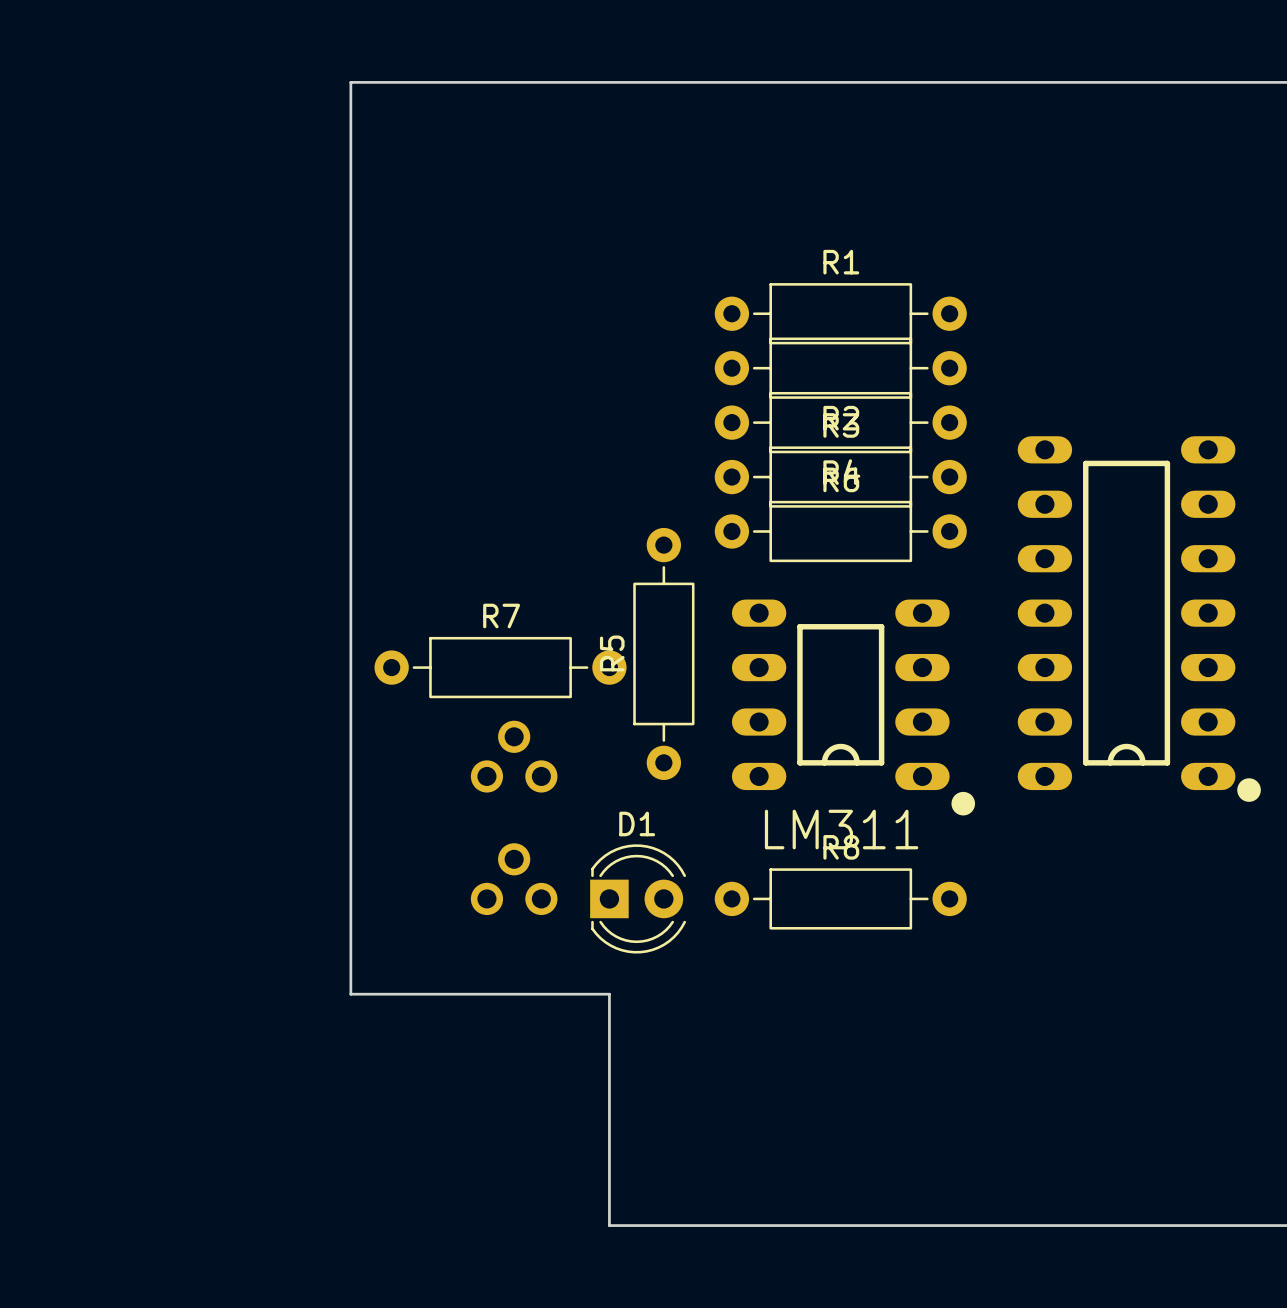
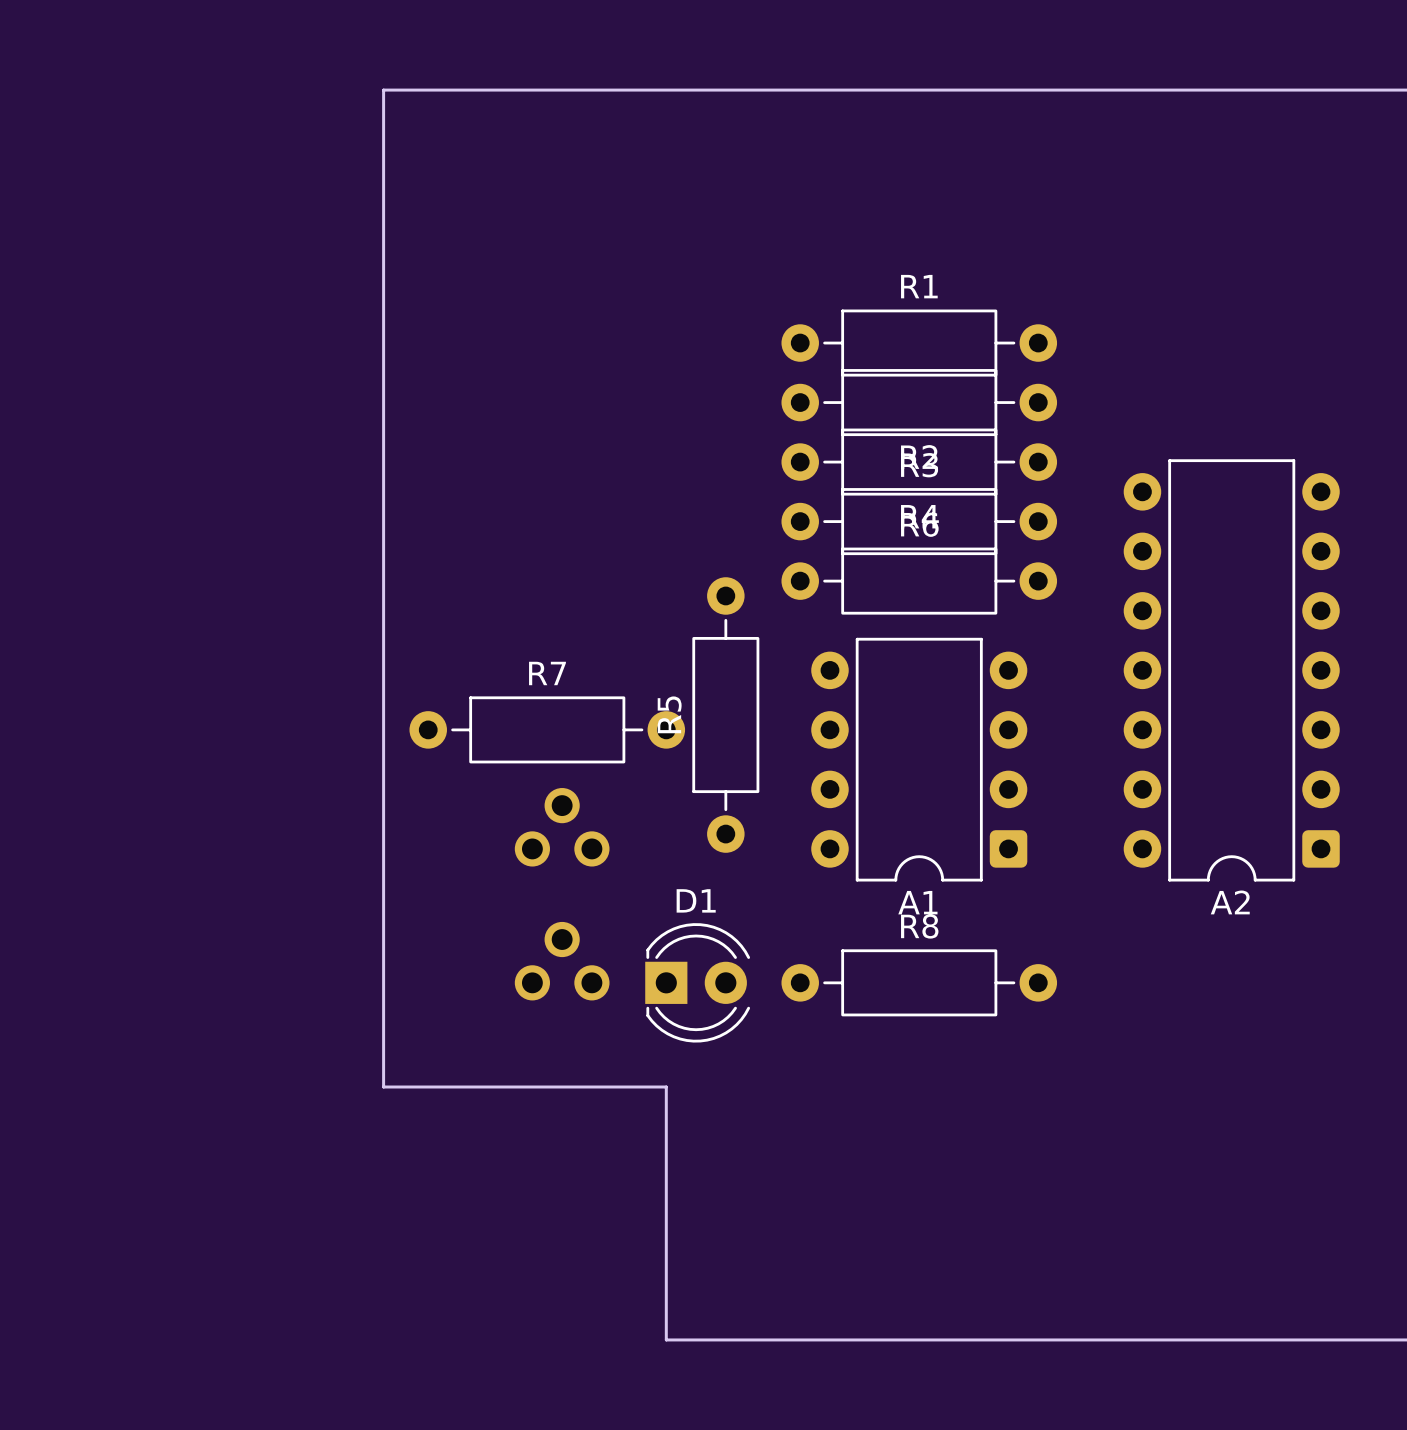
A2: none -> (1231, 670)
part: (1139, 619) -> none
A1: none -> (919, 759)
part: LM311 (853, 707) -> none

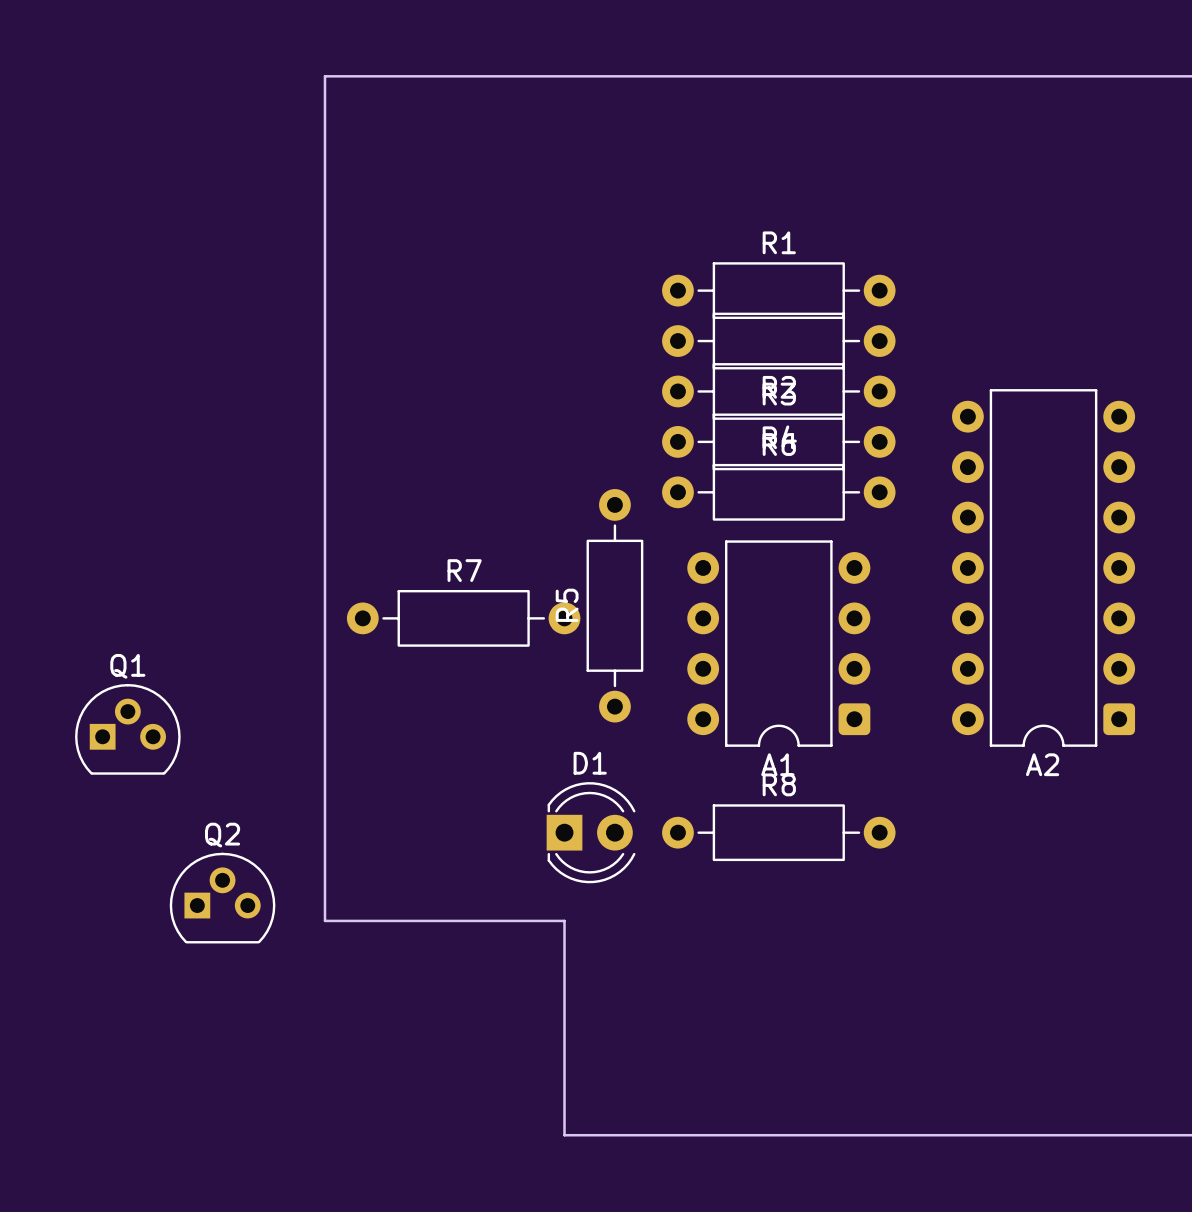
part: (562, 827) -> none
Q1: none -> (127, 729)
part: (562, 961) -> none
Q2: none -> (222, 898)

